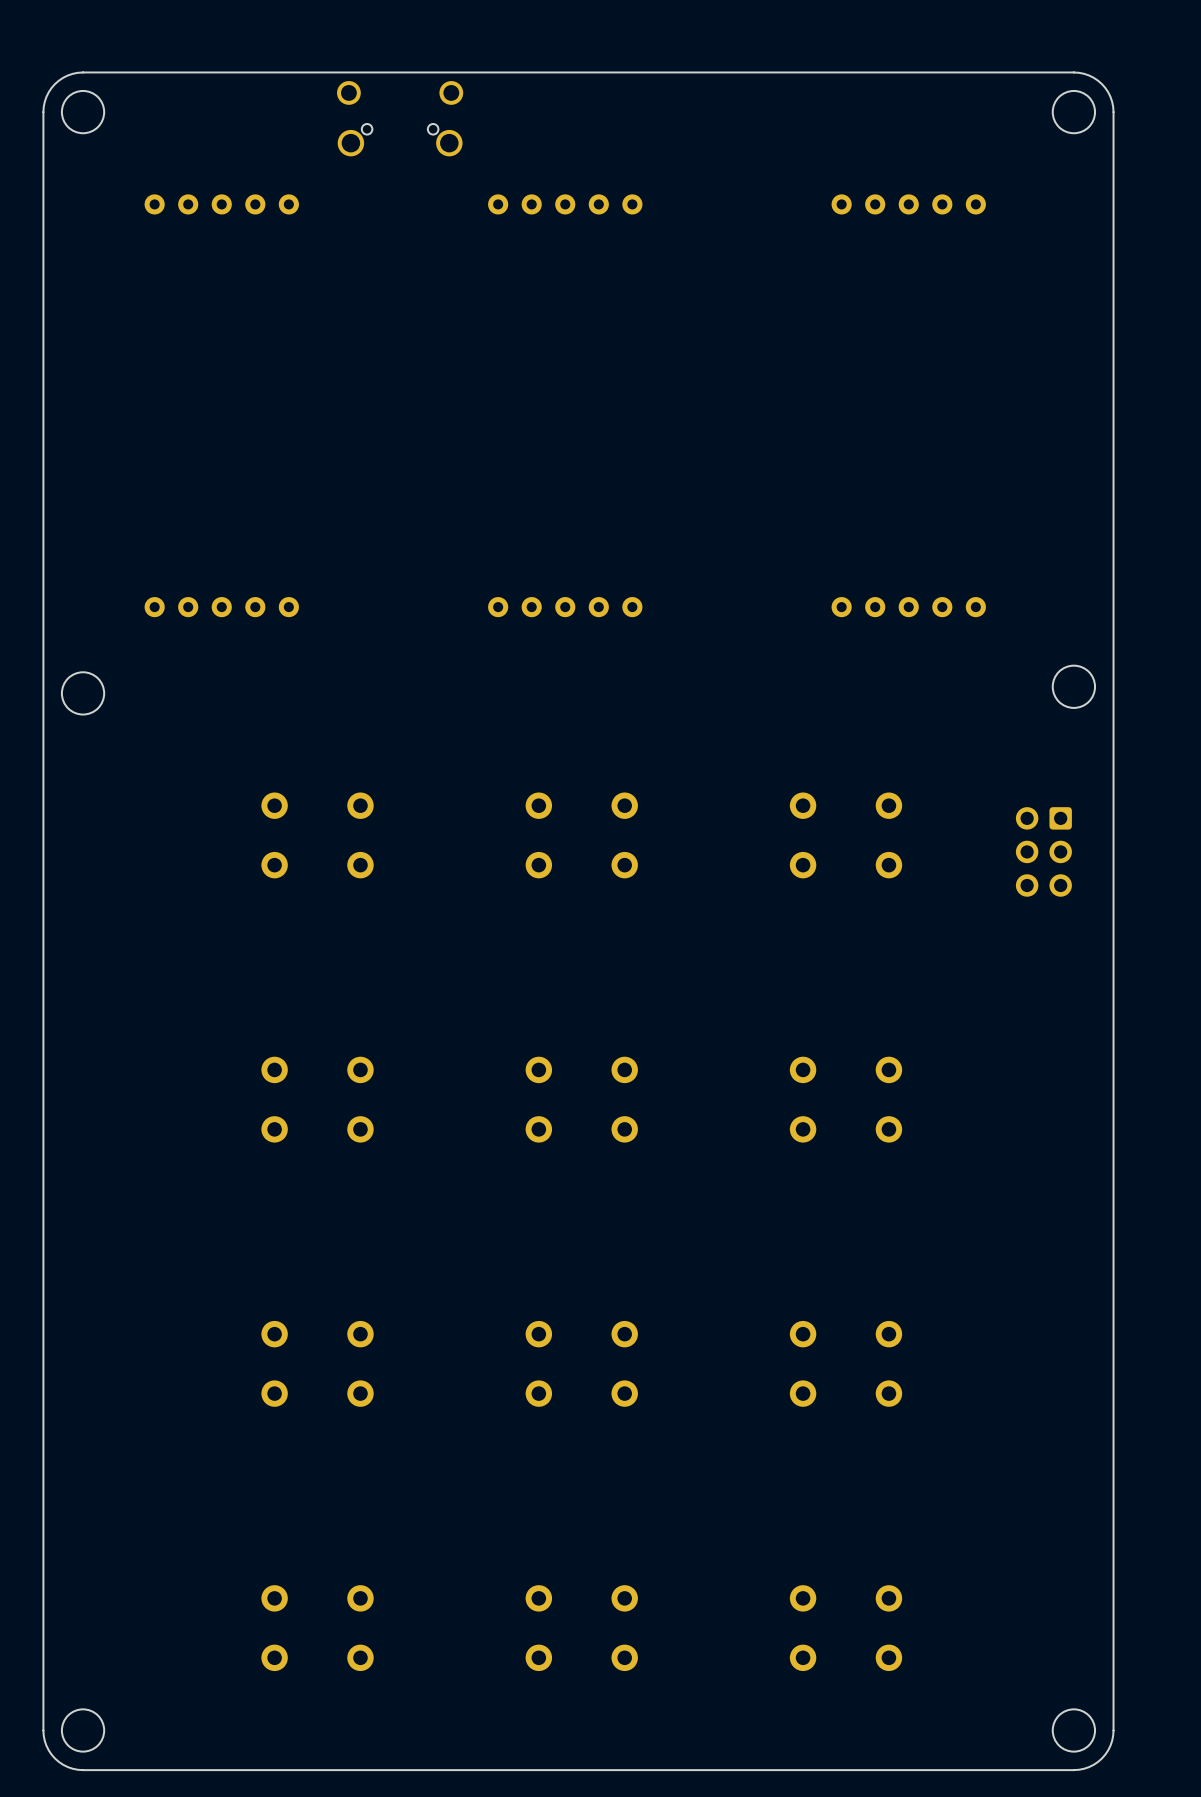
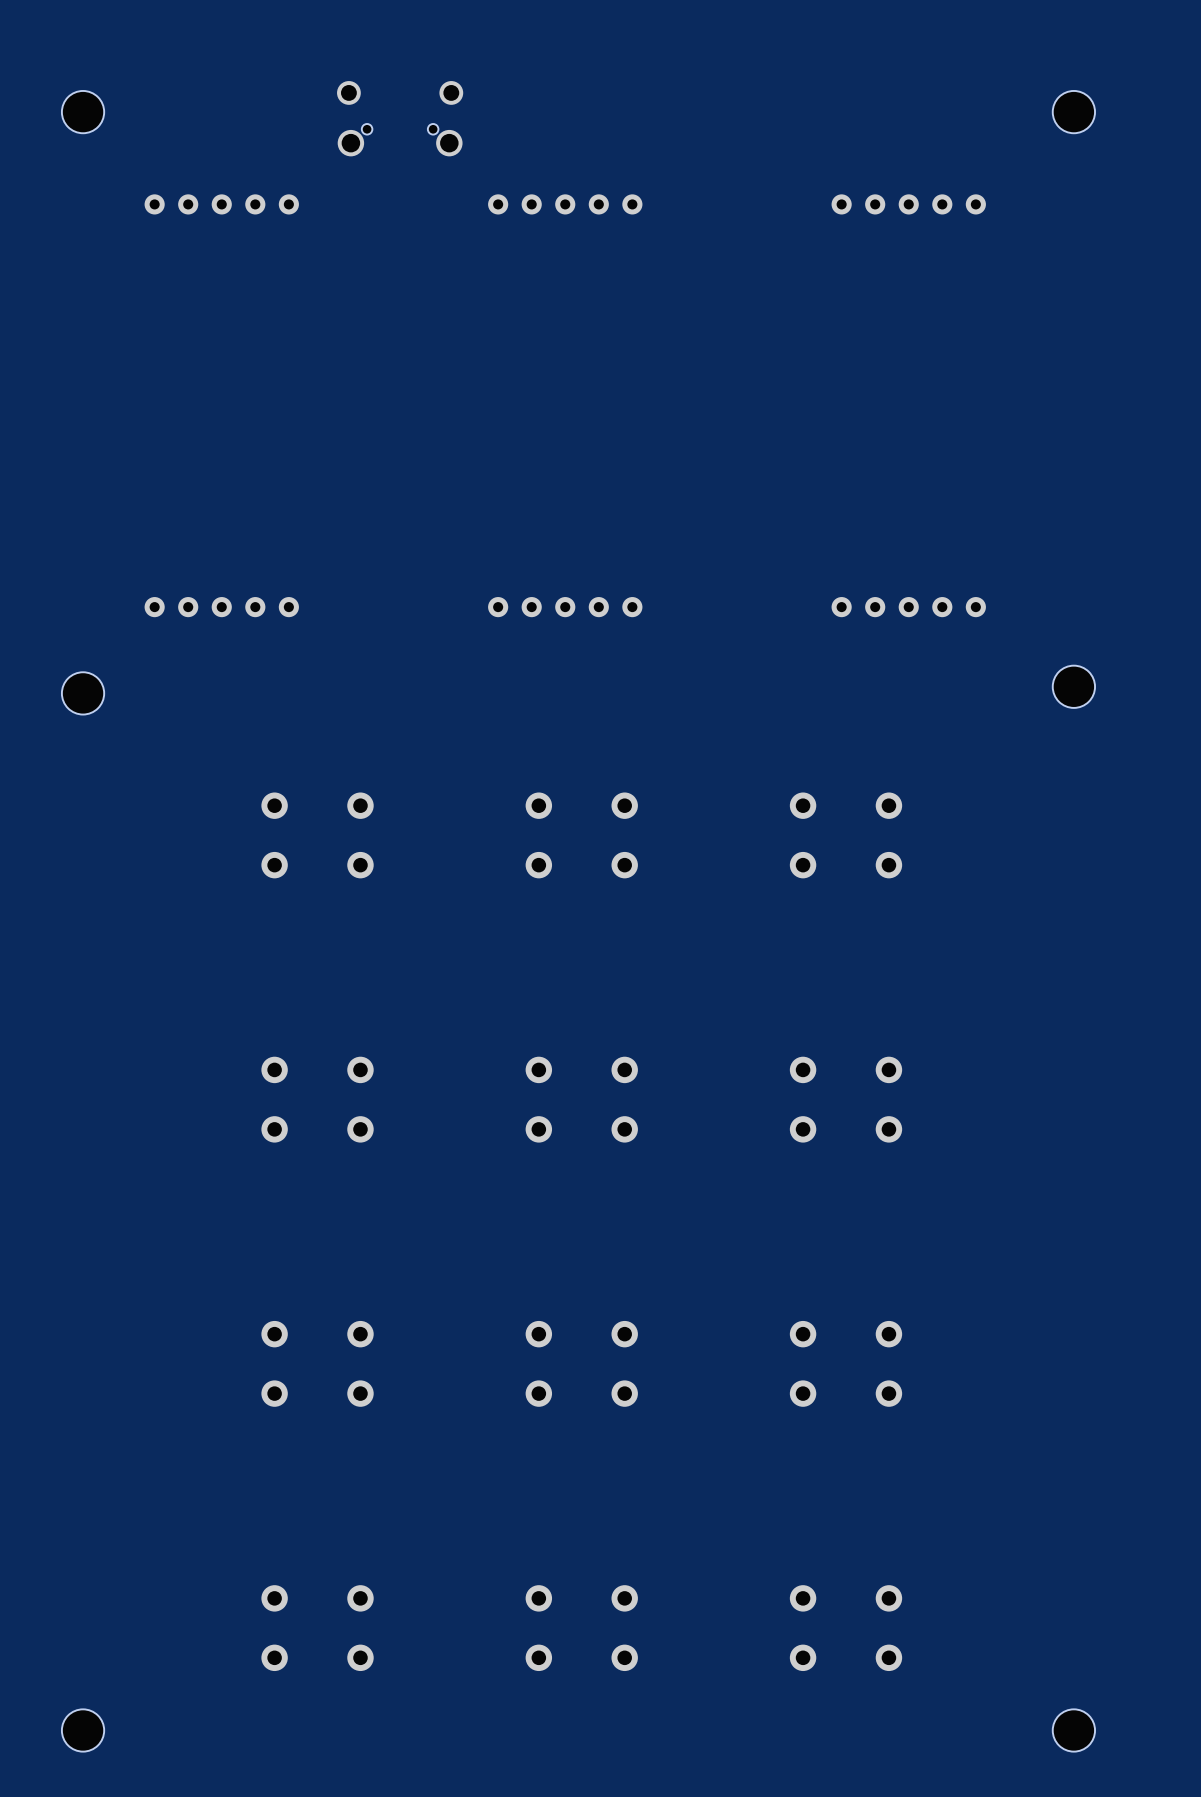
board edge: (1073, 72) (83, 72) (63, 77) (48, 92) (43, 112) (43, 1730) (48, 1750) (63, 1764) (83, 1770) (1073, 1770) (1093, 1764) (1108, 1750) (1113, 1730) (1113, 112) (1110, 96) (1101, 84) (1089, 75) (1073, 72) -> none
part: (1043, 851) -> none

